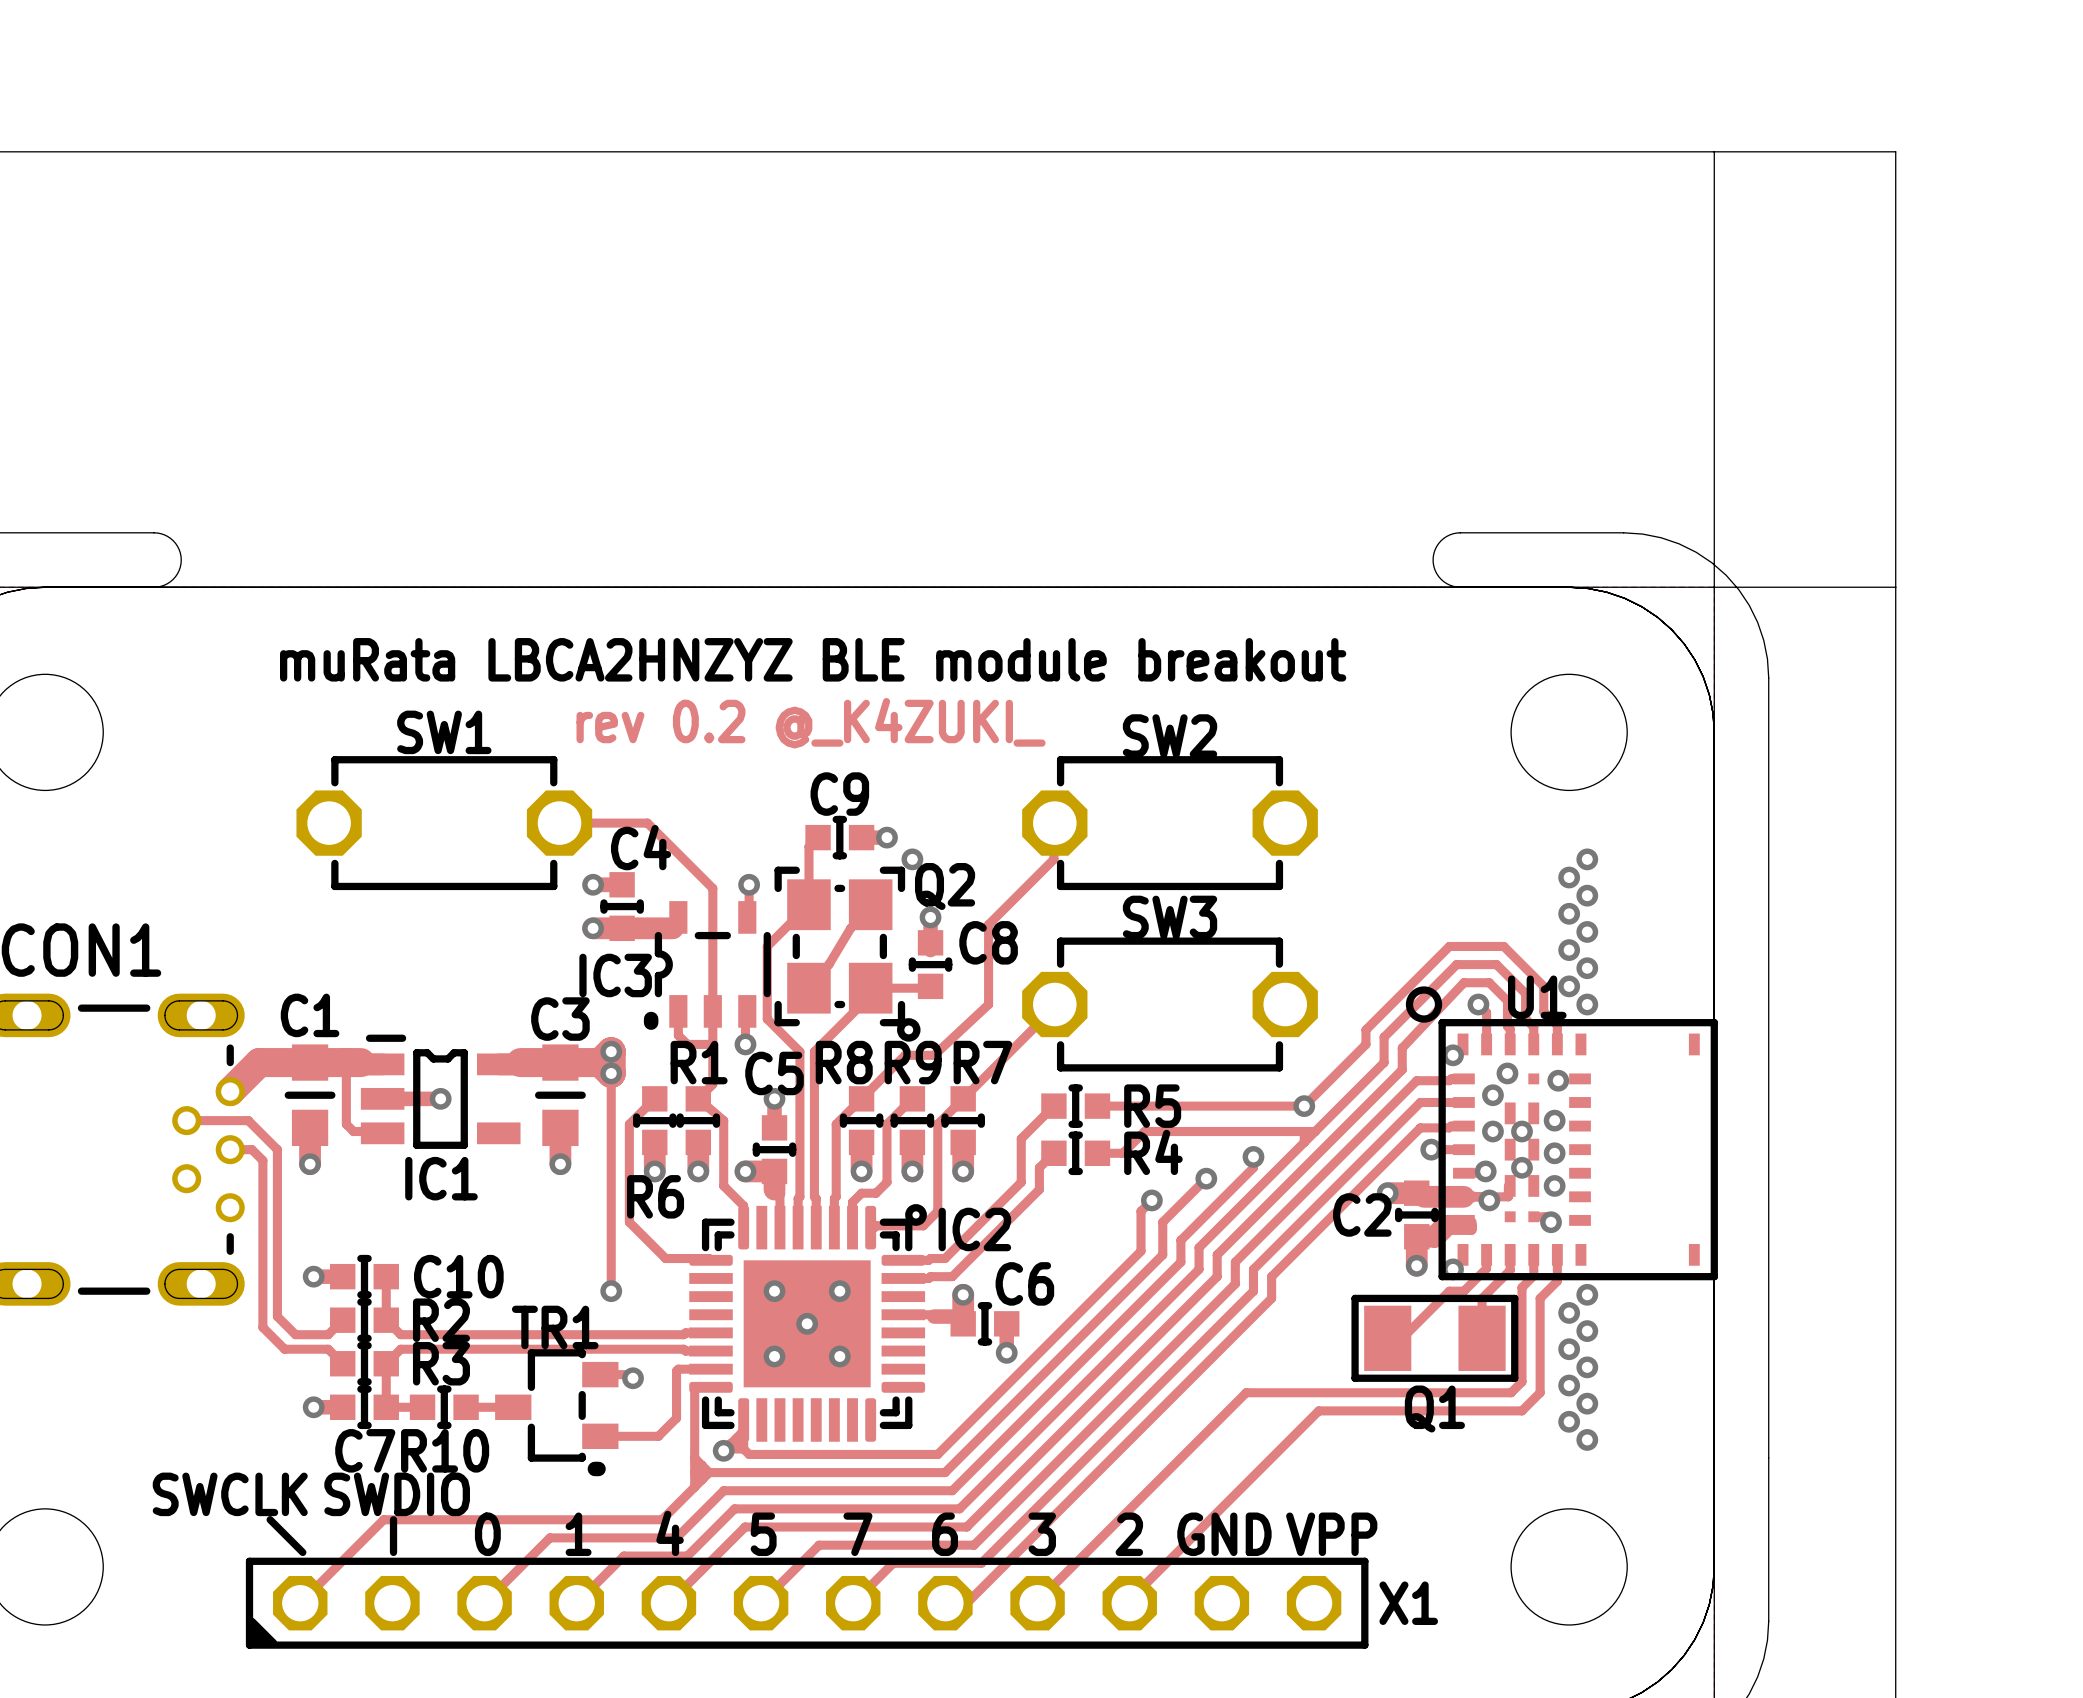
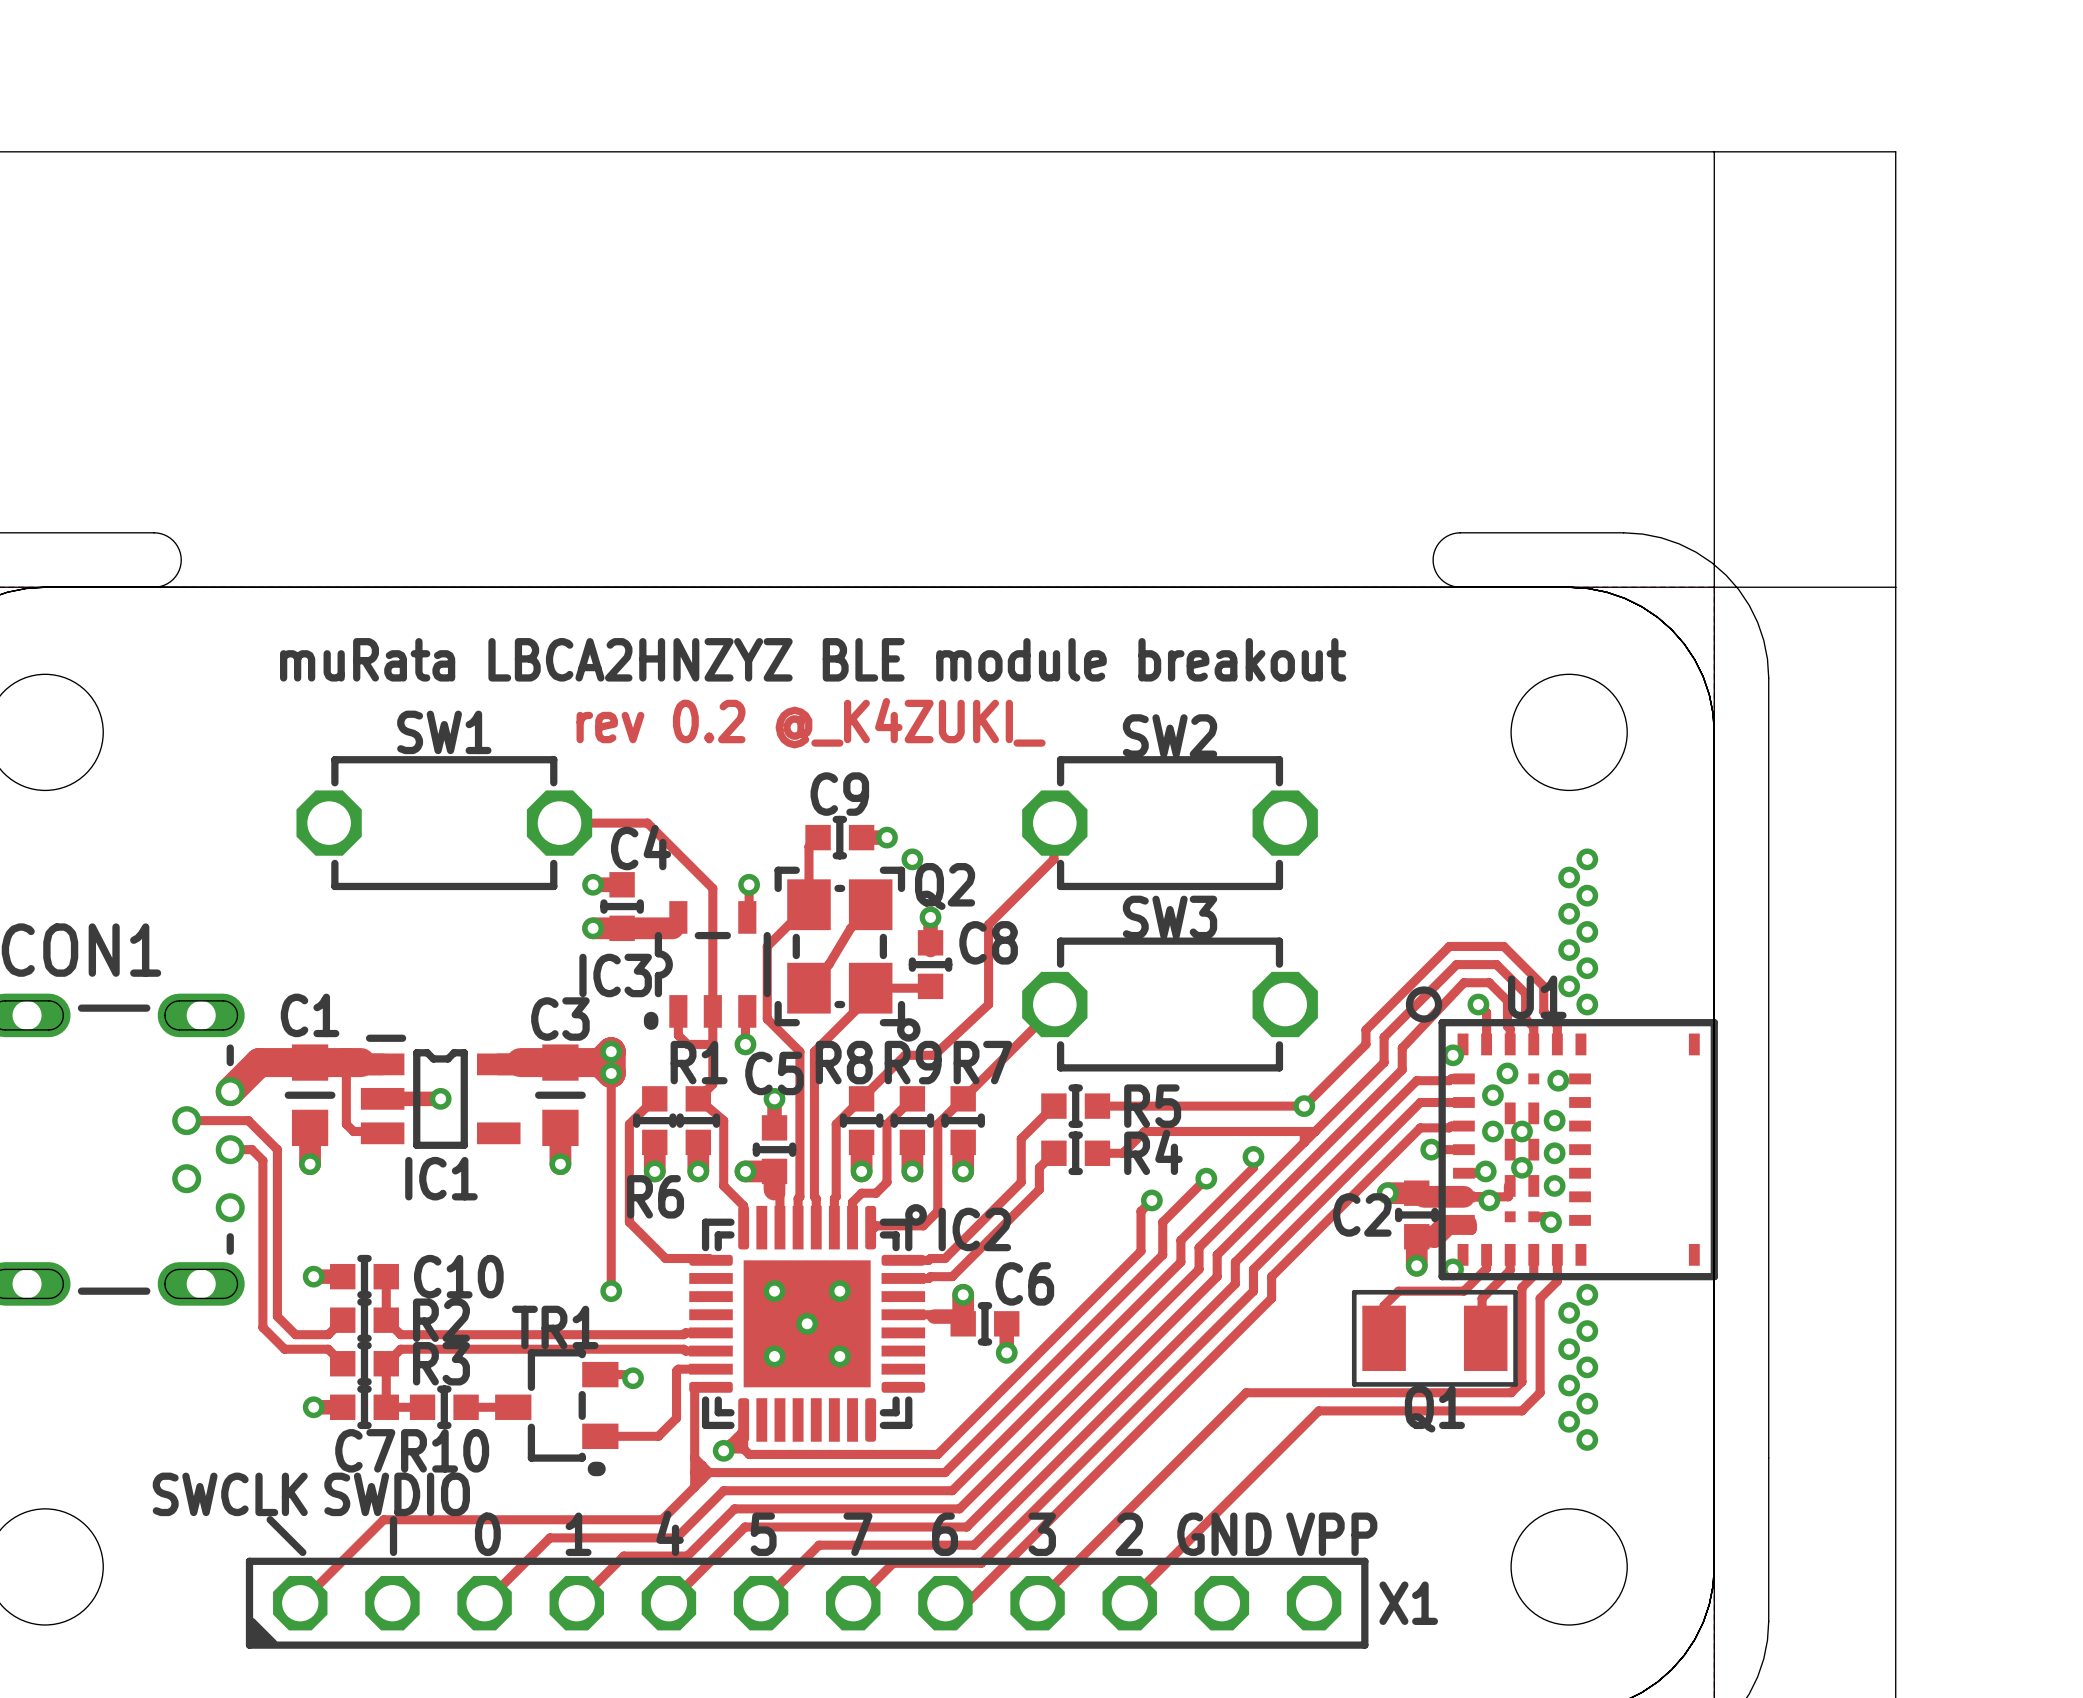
track: (1449, 1291) (1402, 1338) (1387, 1338) -> (1449, 1291) (1398, 1291) (1384, 1305) (1384, 1338)
Q1 footprint: [1351, 1294, 1519, 1382] -> [1351, 1289, 1518, 1387]

